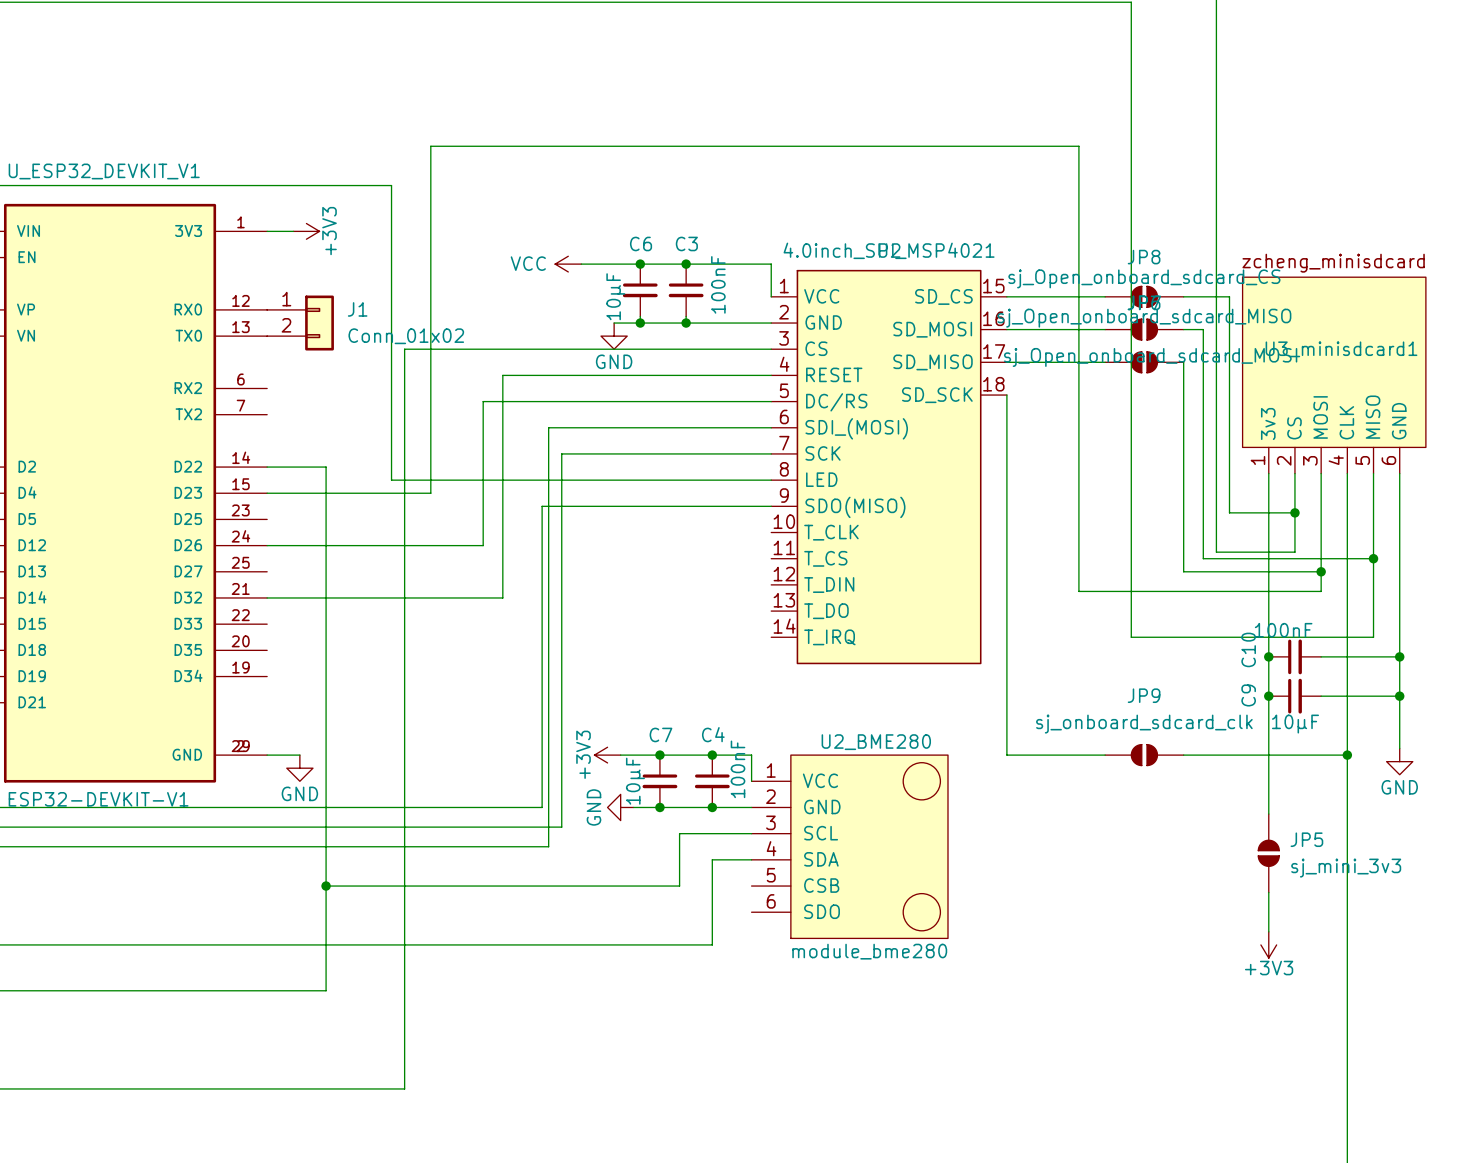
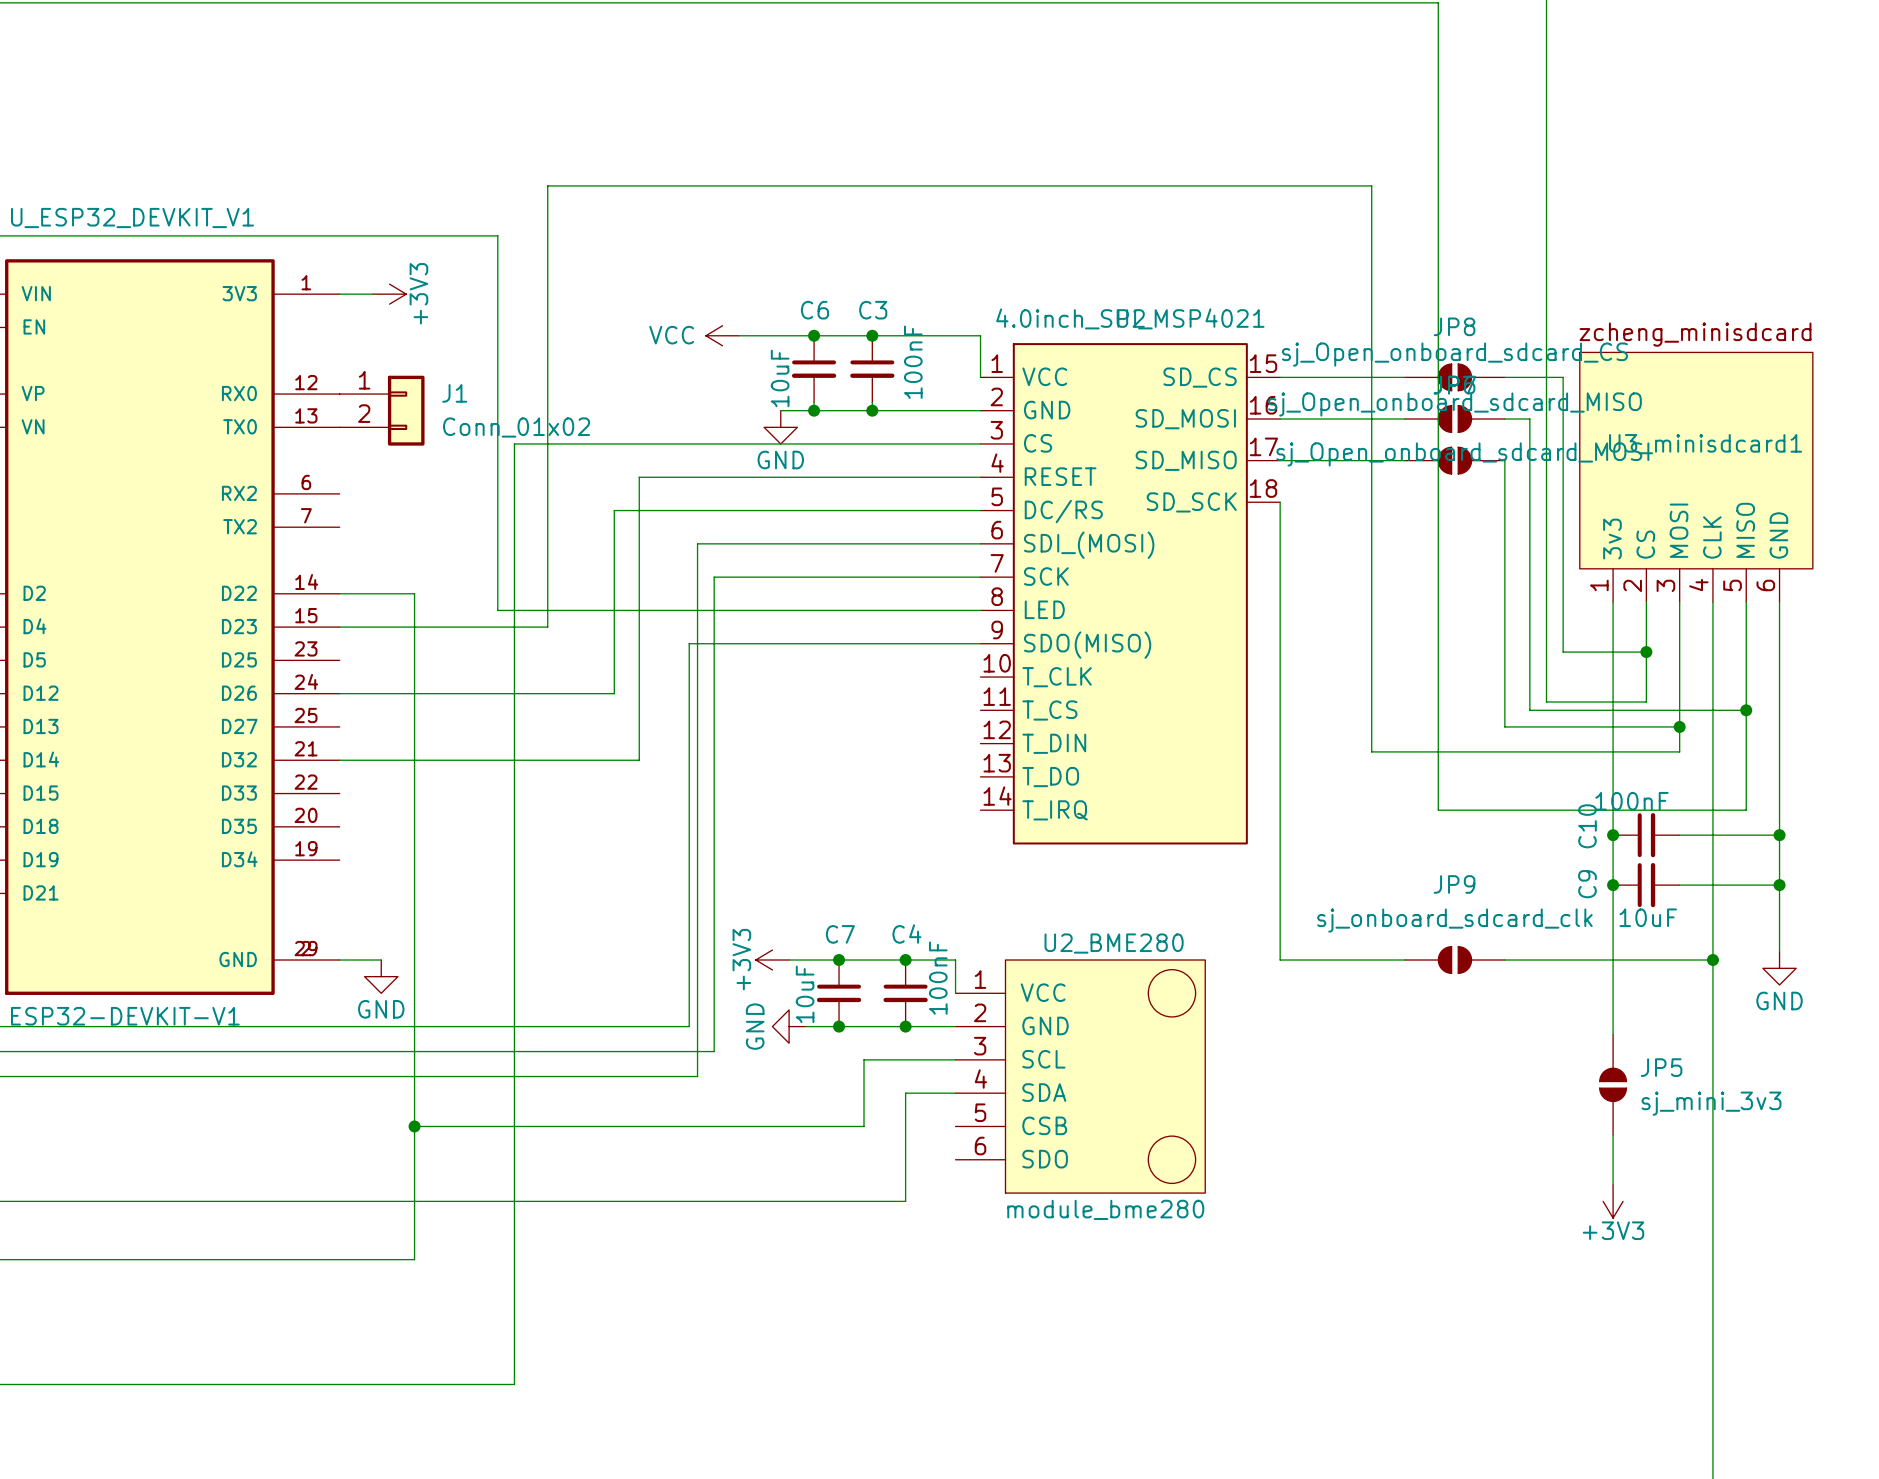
C6 value: 10µF (615, 296) -> 10uF (780, 378)
C9 value: 10µF (1295, 724) -> 10uF (1648, 917)
C7 value: 10µF (635, 781) -> 10uF (805, 994)

